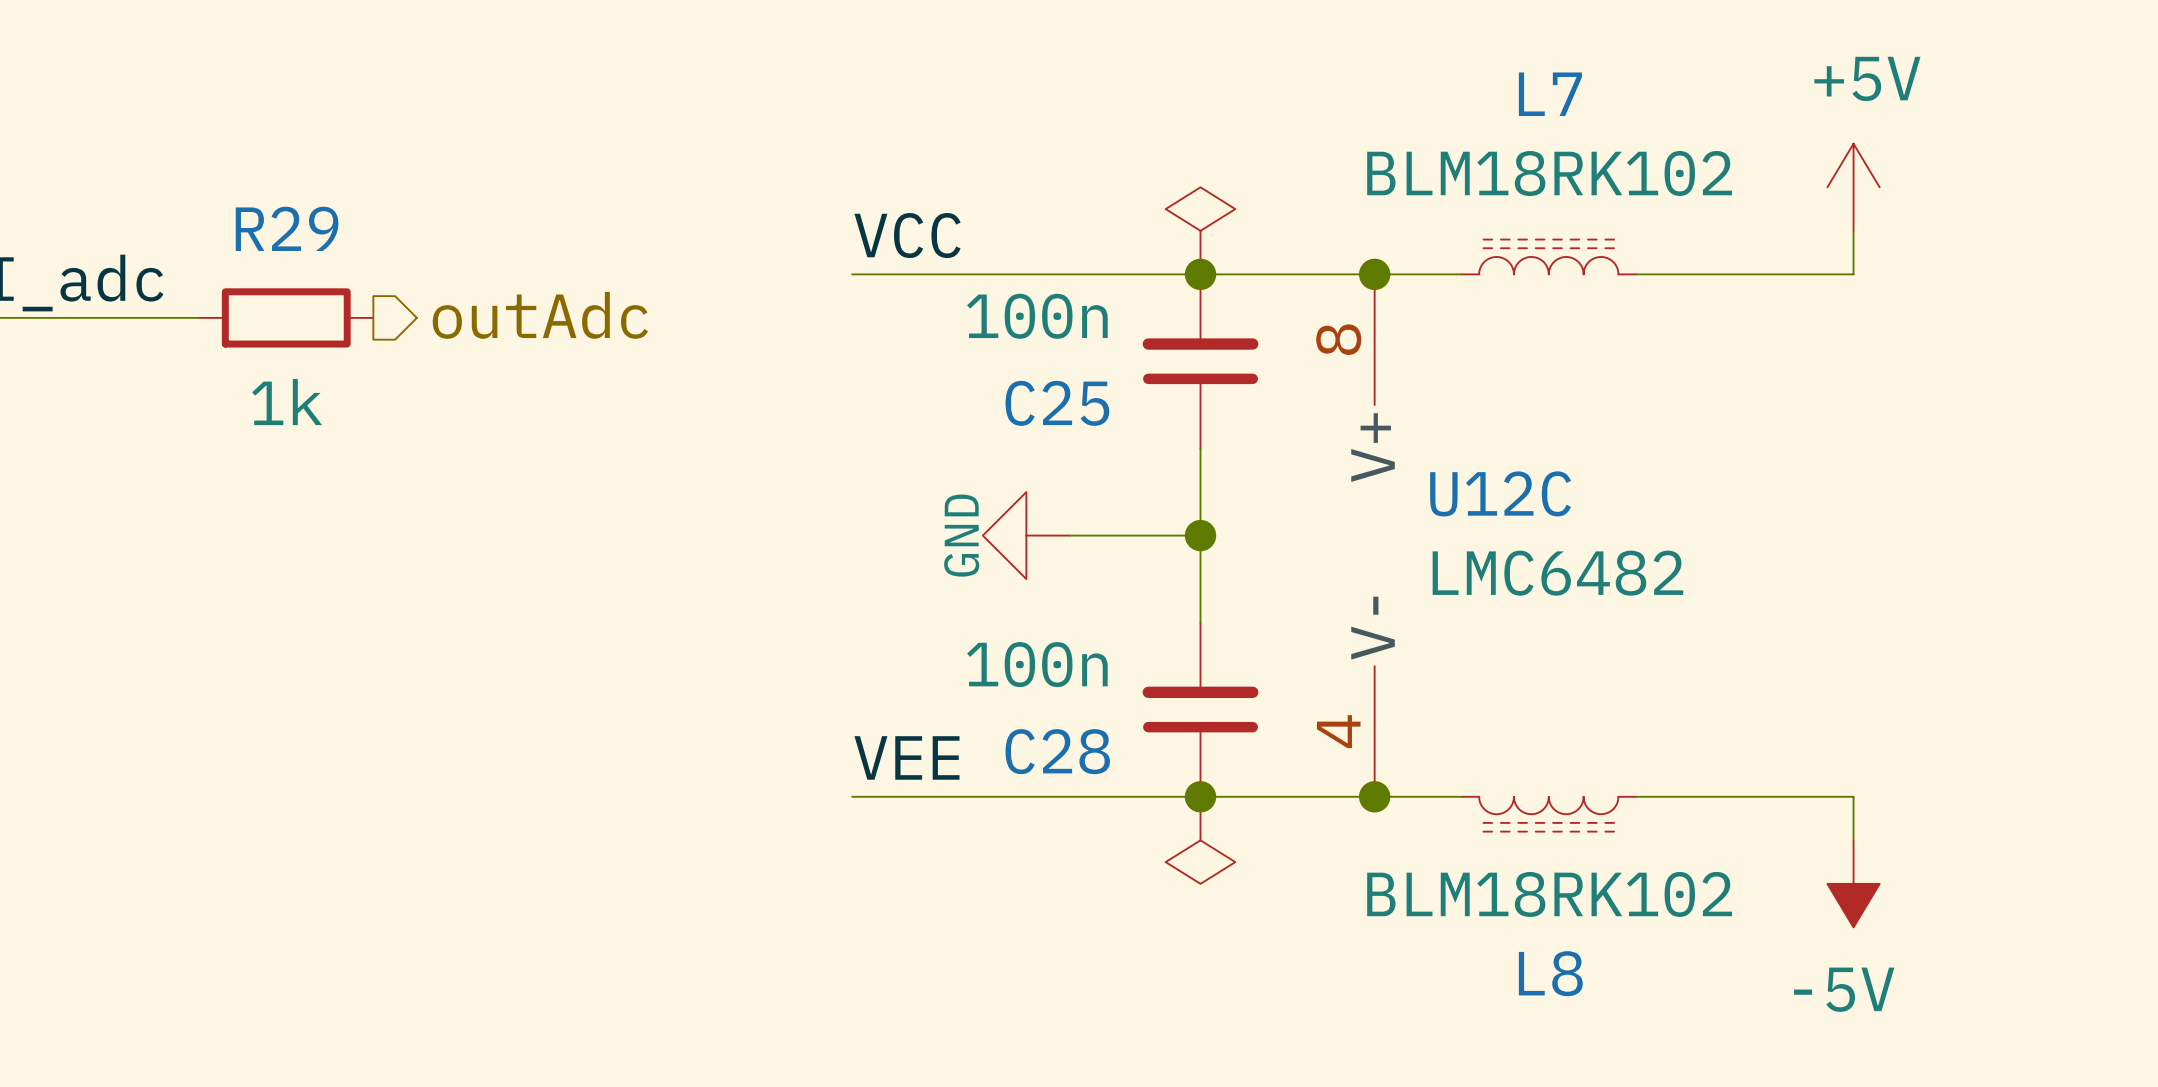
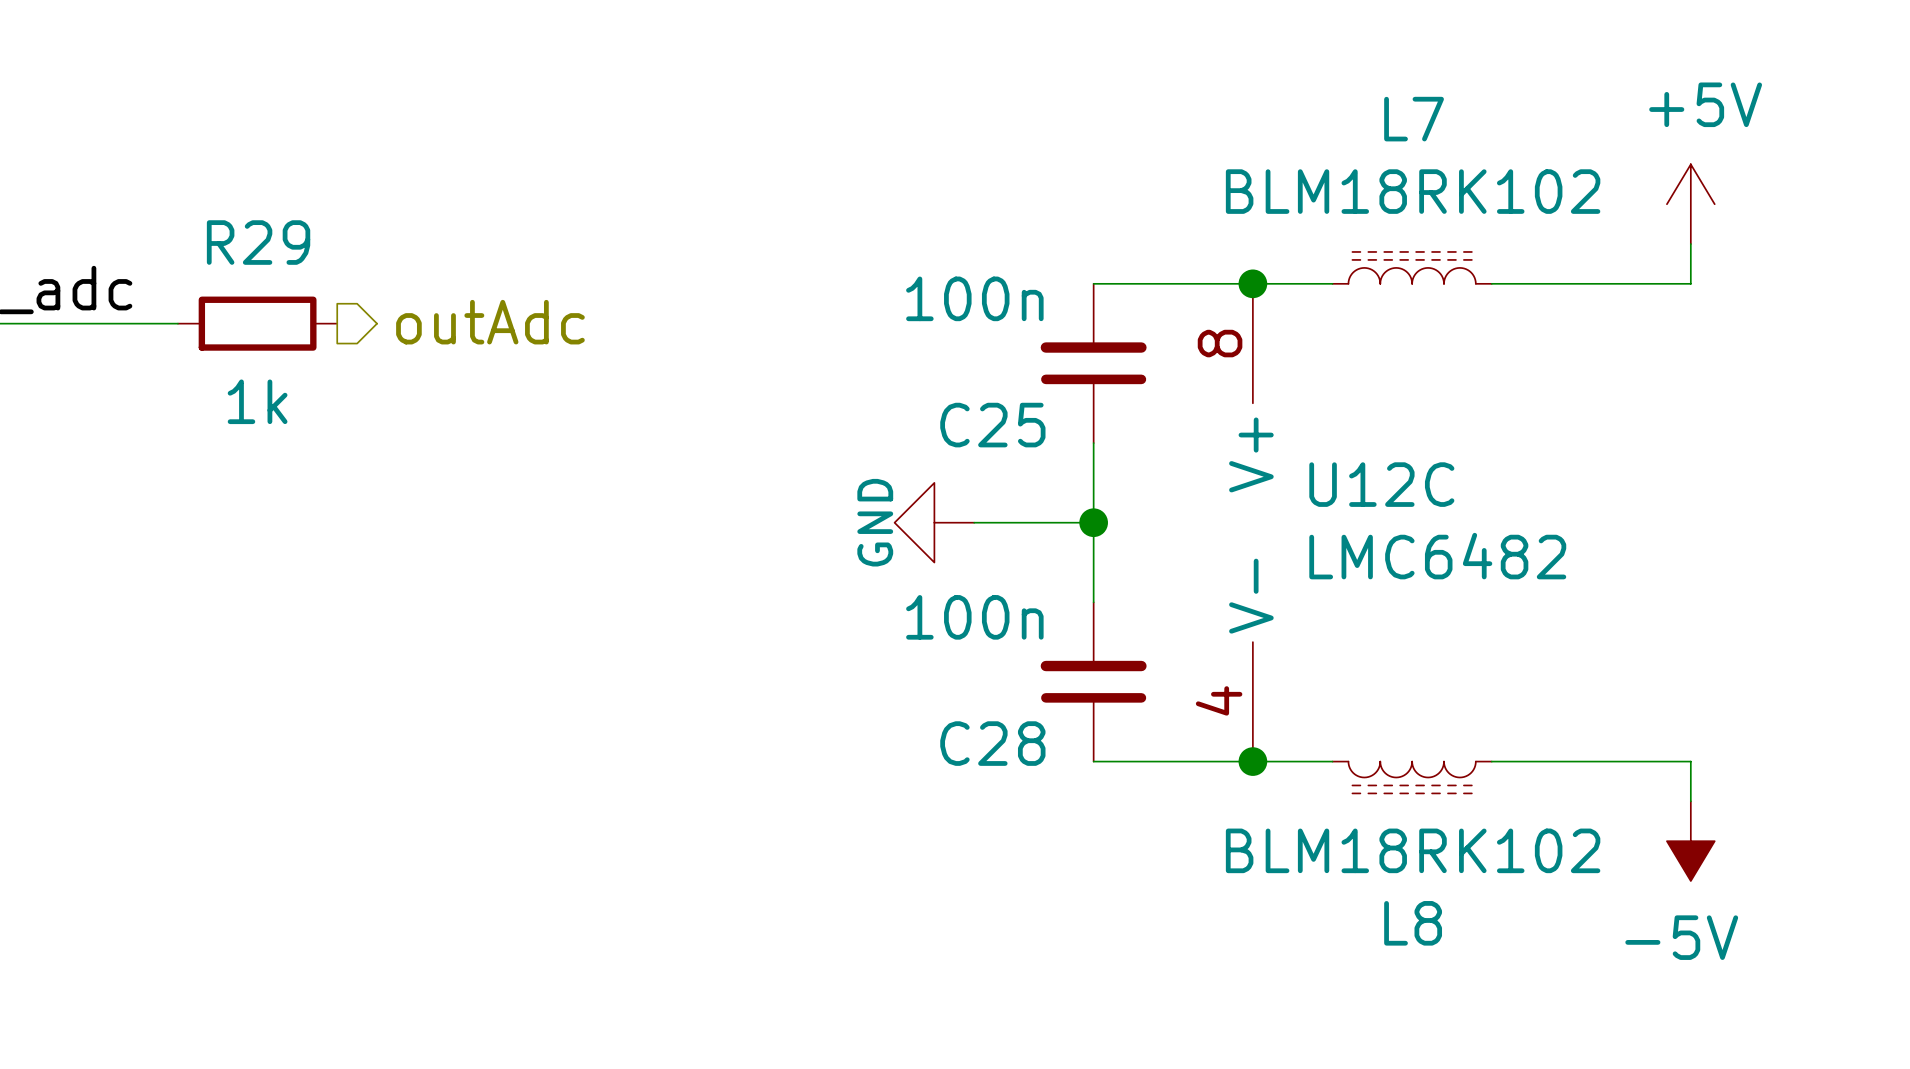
power symbol: (1200, 230) -> none
label: VCC (907, 235) -> none
wire: (852, 274) (1200, 274) -> none
junction: (1200, 274) -> none
C25 value position: 100n (1037, 316) -> 100n (974, 298)
C25 name position: C25 (1057, 403) -> C25 (992, 425)
C28 value position: 100n (1037, 664) -> 100n (974, 617)
C28 name position: C28 (1057, 751) -> C28 (992, 743)
label: VEE (906, 757) -> none
wire: (852, 796) (1200, 796) -> none
junction: (1200, 796) -> none
power symbol: (1200, 840) -> none

